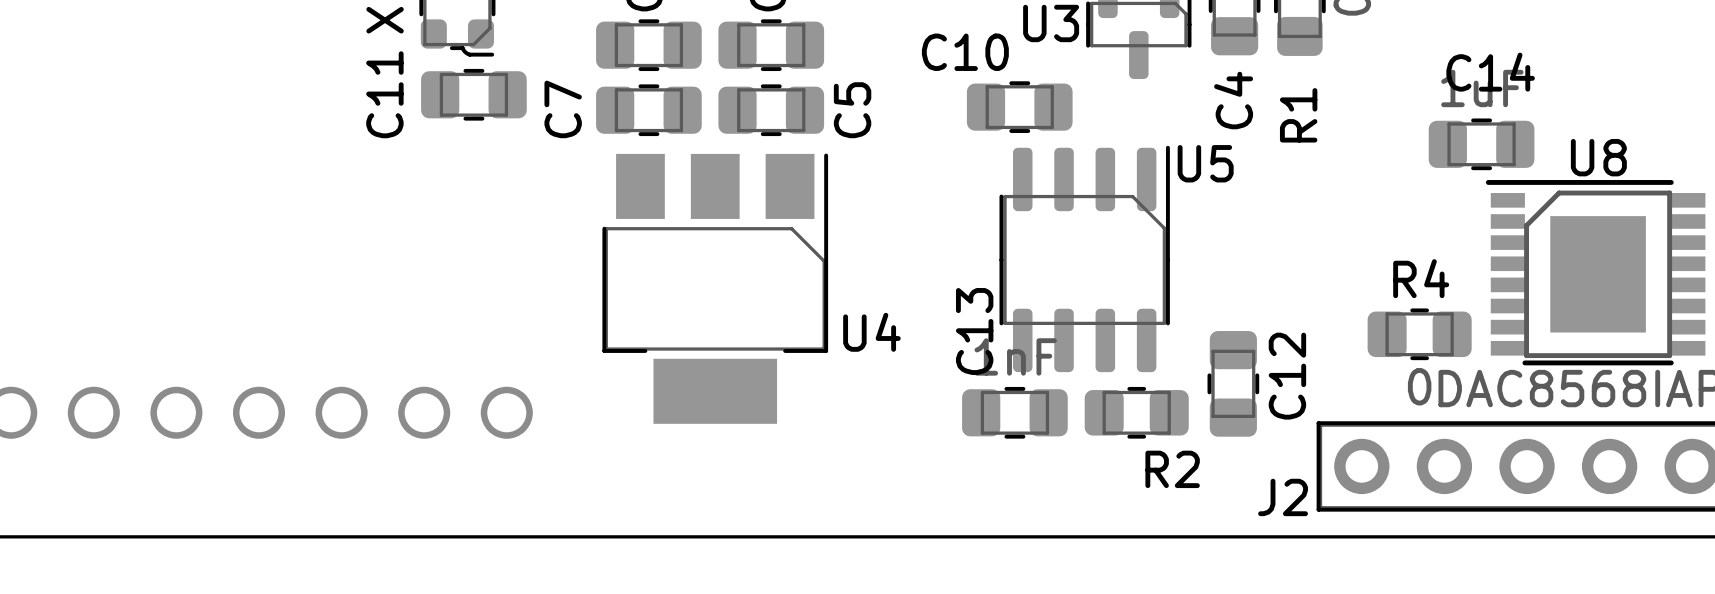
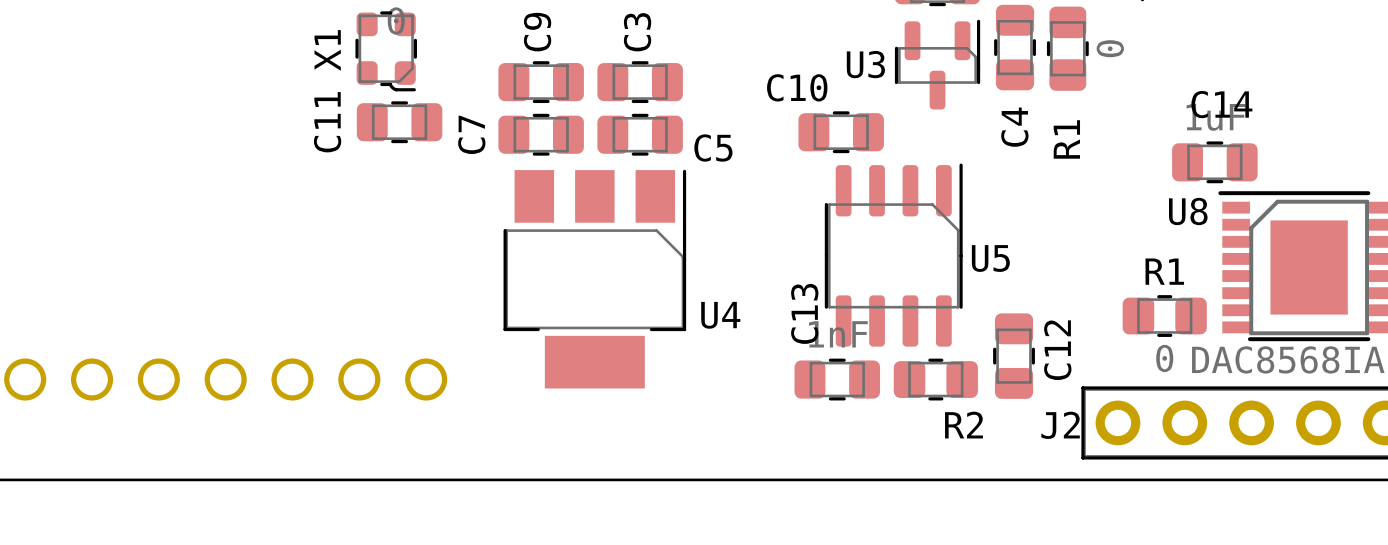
C5 name rotation: 0° (852, 110) -> 90° clockwise (713, 148)
U8 name position: U8 (1598, 157) -> U8 (1188, 211)
U5 name position: U5 (1205, 163) -> U5 (990, 258)
R4 name: R4 (1421, 278) -> R1 (1164, 271)
J2 name position: J2 (1283, 497) -> J2 (1060, 425)

